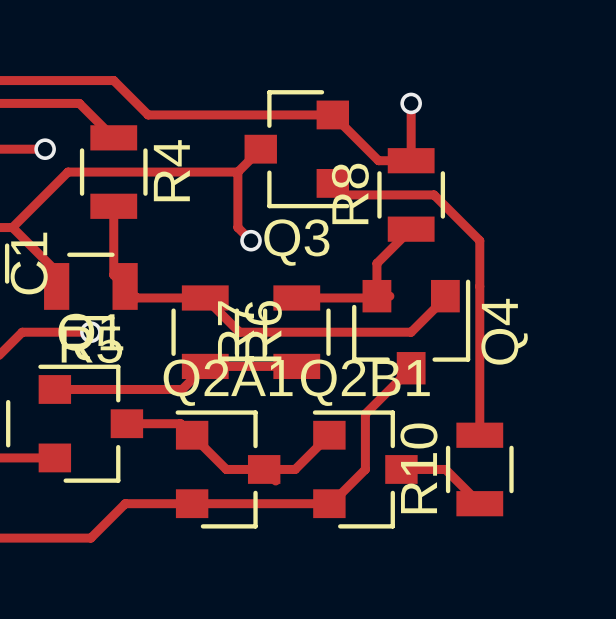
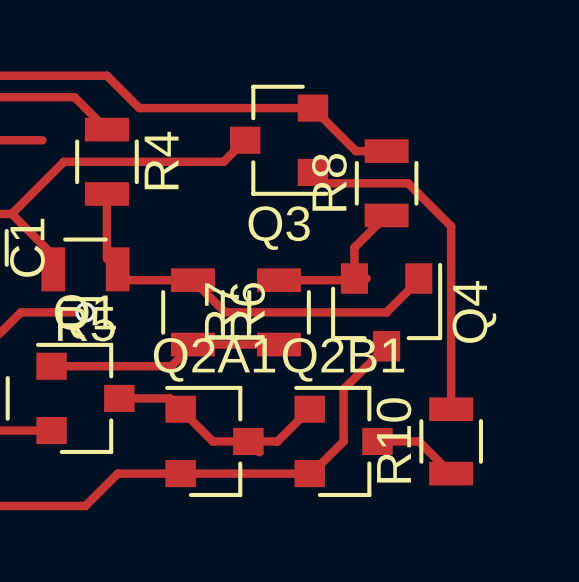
track: (411, 103) (411, 160) -> none
via: (411, 103) -> none
via: (45, 149) -> none
track: (237, 172) (237, 227) (251, 240) -> none
via: (251, 240) -> none

